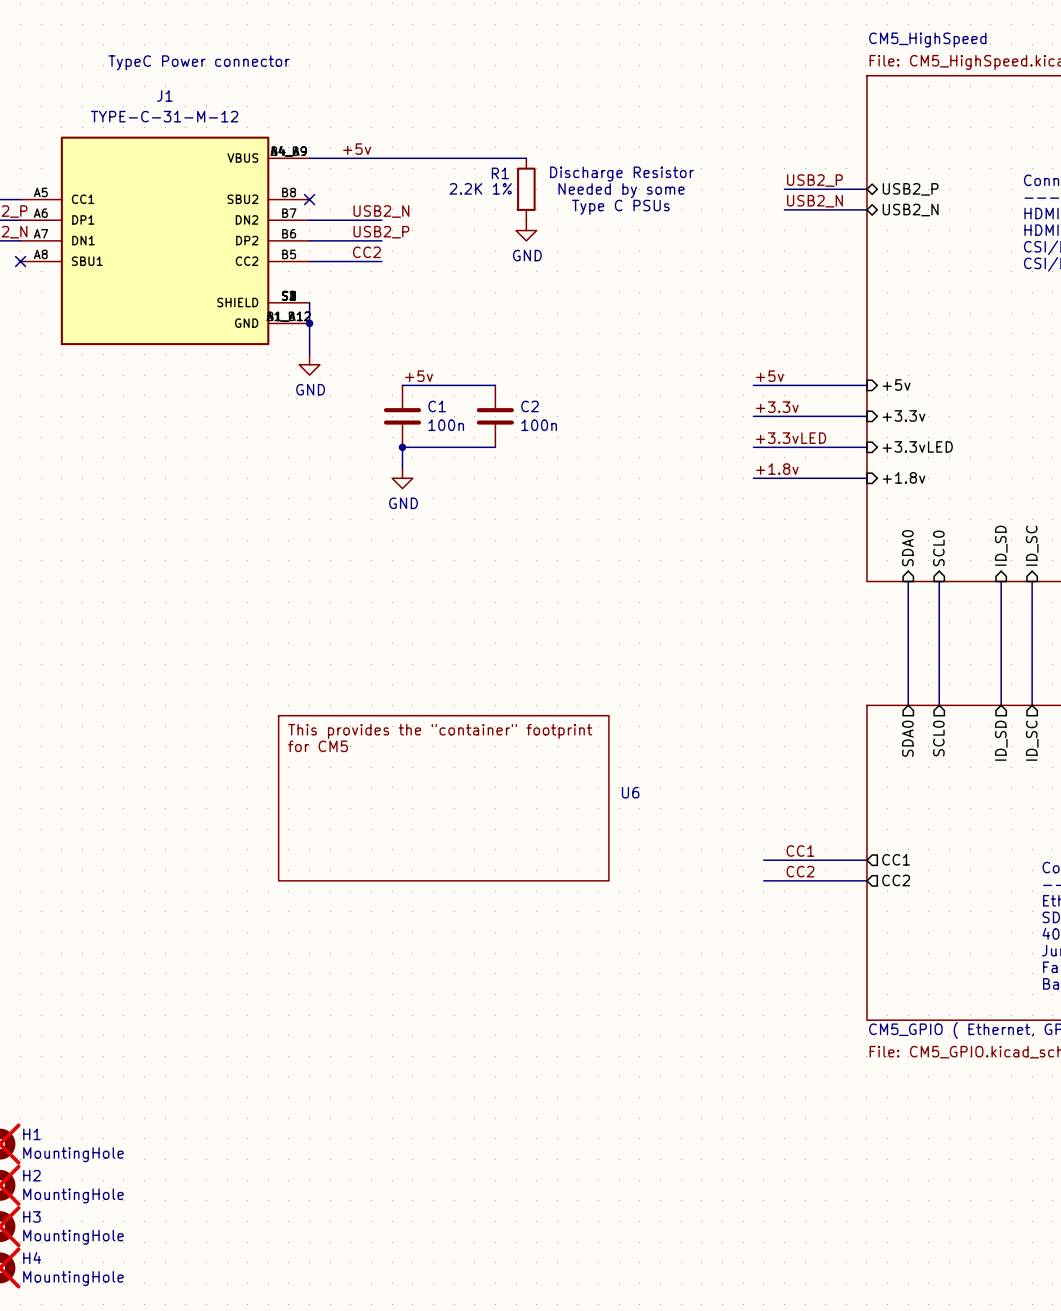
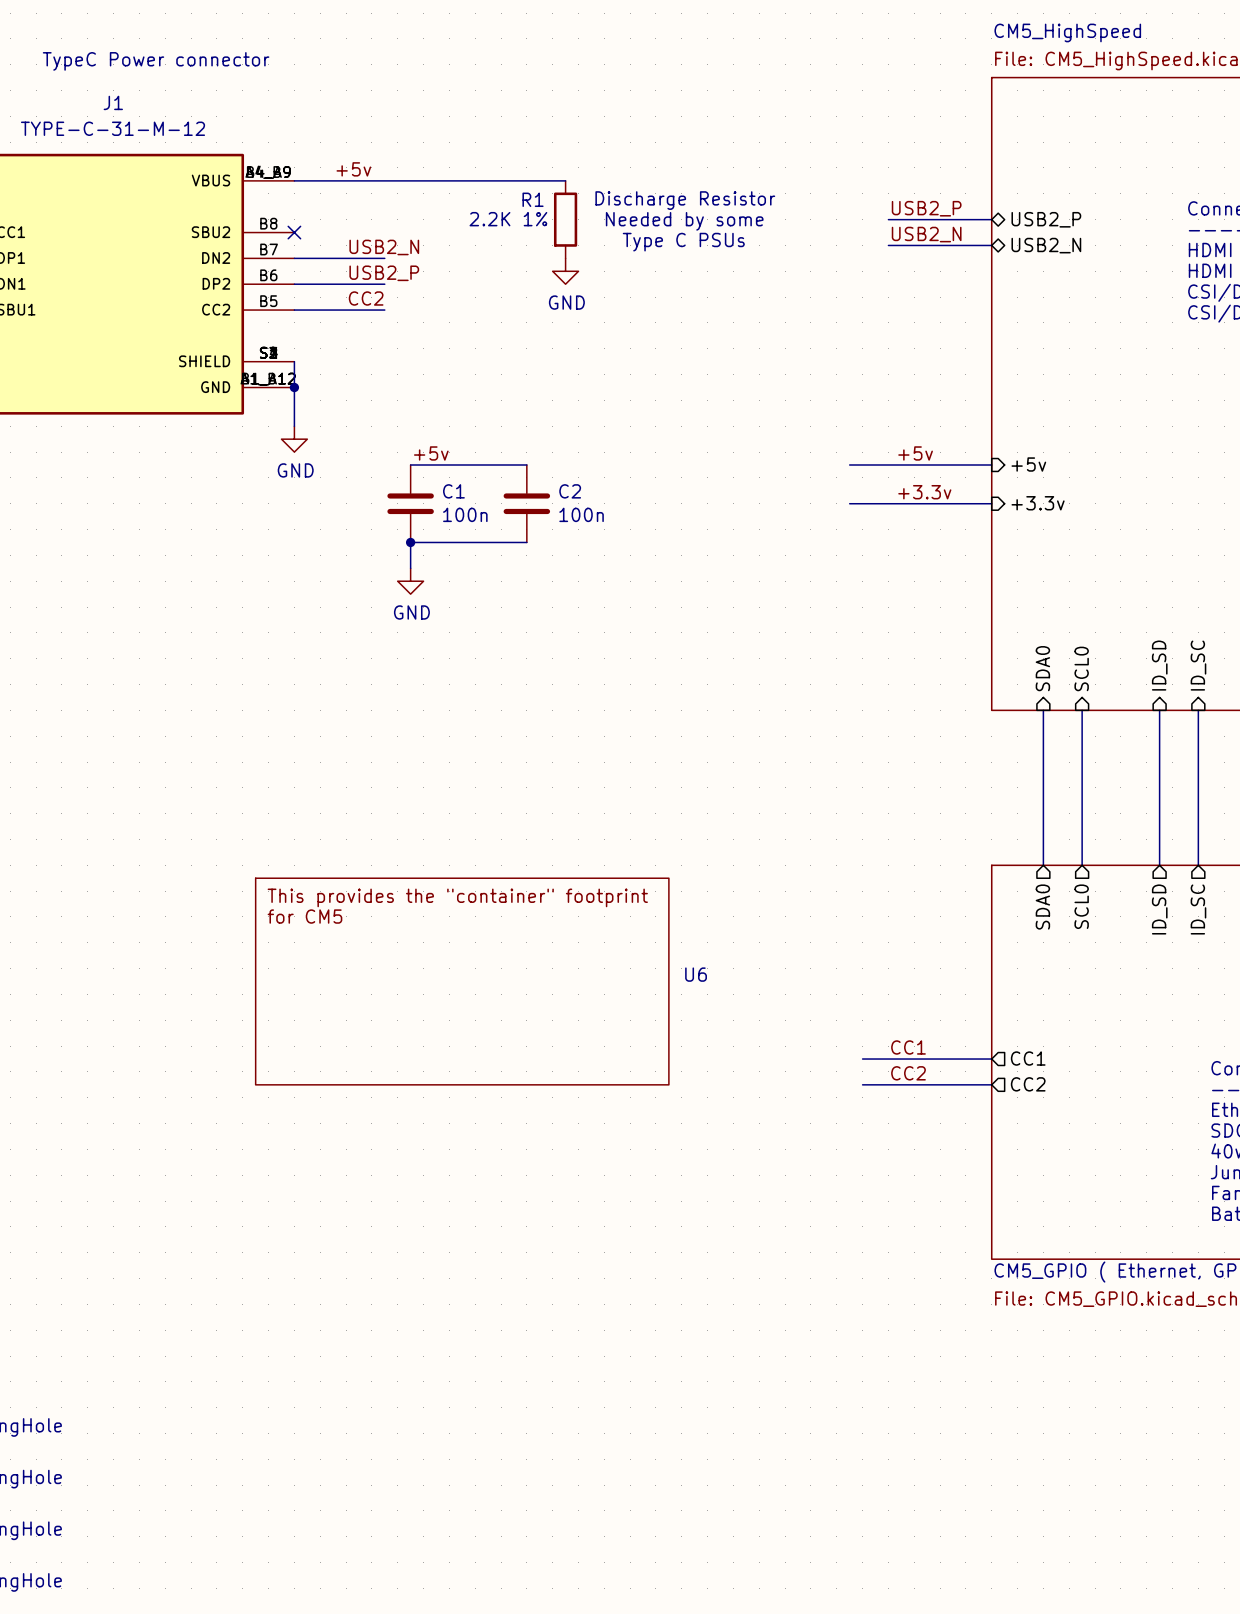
label position: +5v (769, 376) -> +5v (915, 453)
label position: +3.3v (777, 407) -> +3.3v (924, 492)
label: +3.3vLED (791, 438) -> none
sheet pin: +3.3vLED (917, 446) -> none
wire: (753, 447) (866, 447) -> none
label: +1.8v (777, 469) -> none
sheet pin: +1.8v (904, 477) -> none
wire: (753, 478) (866, 478) -> none

